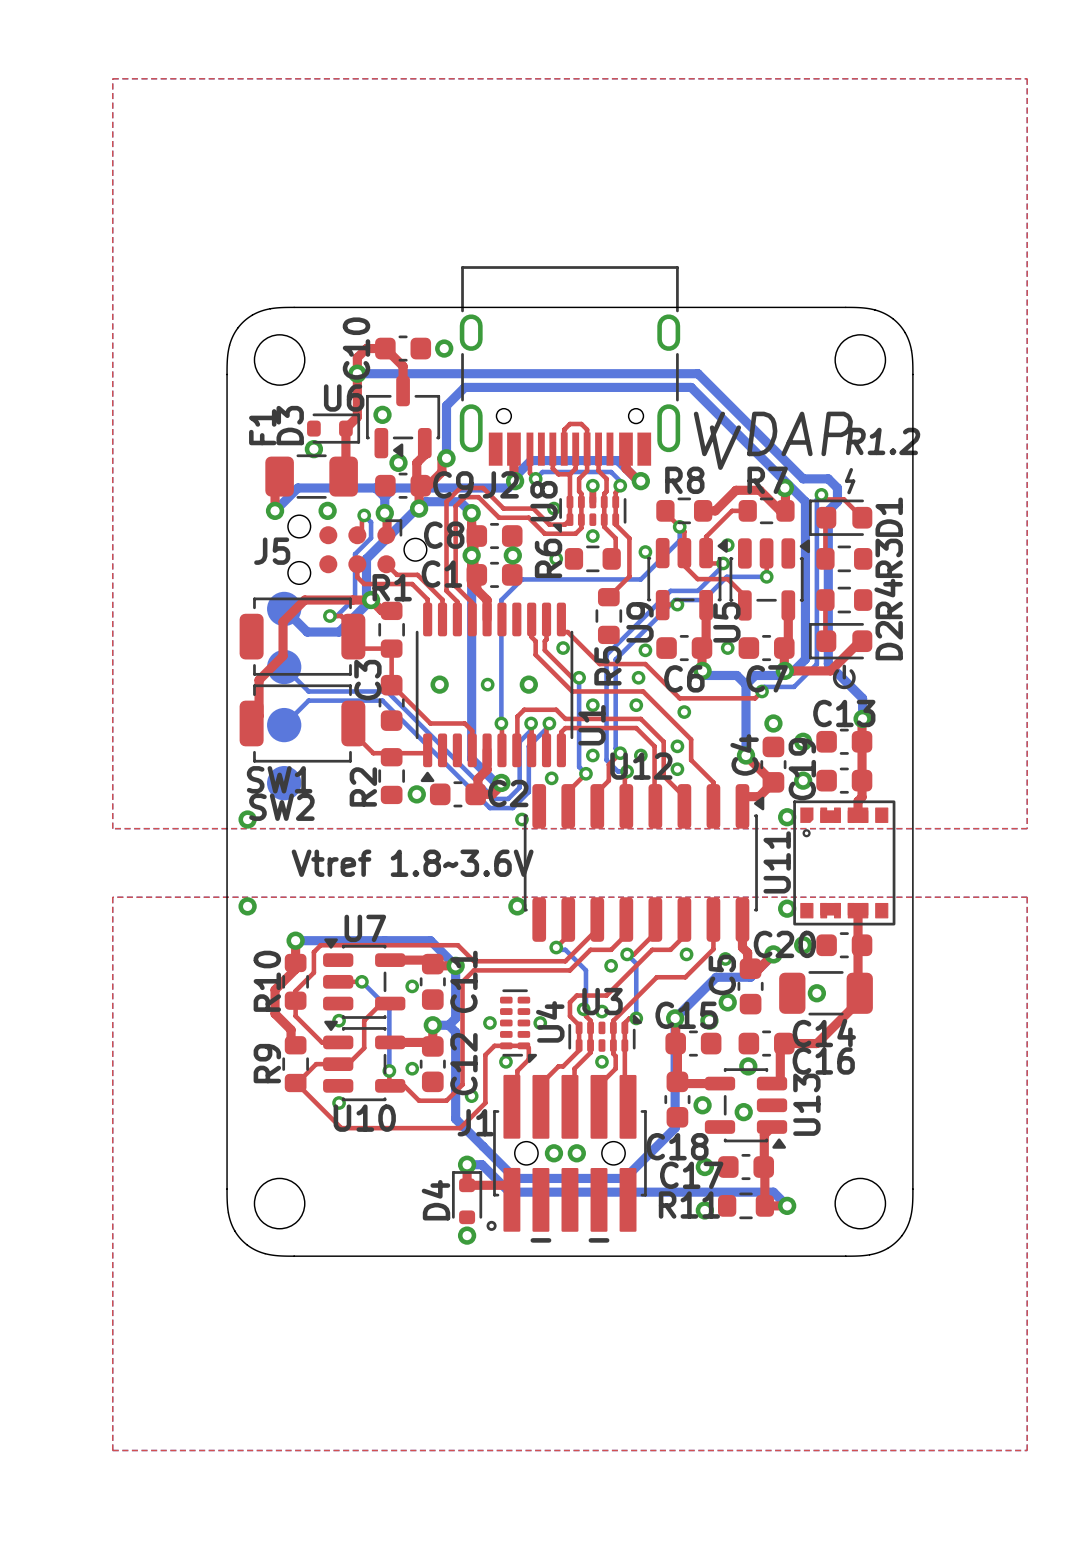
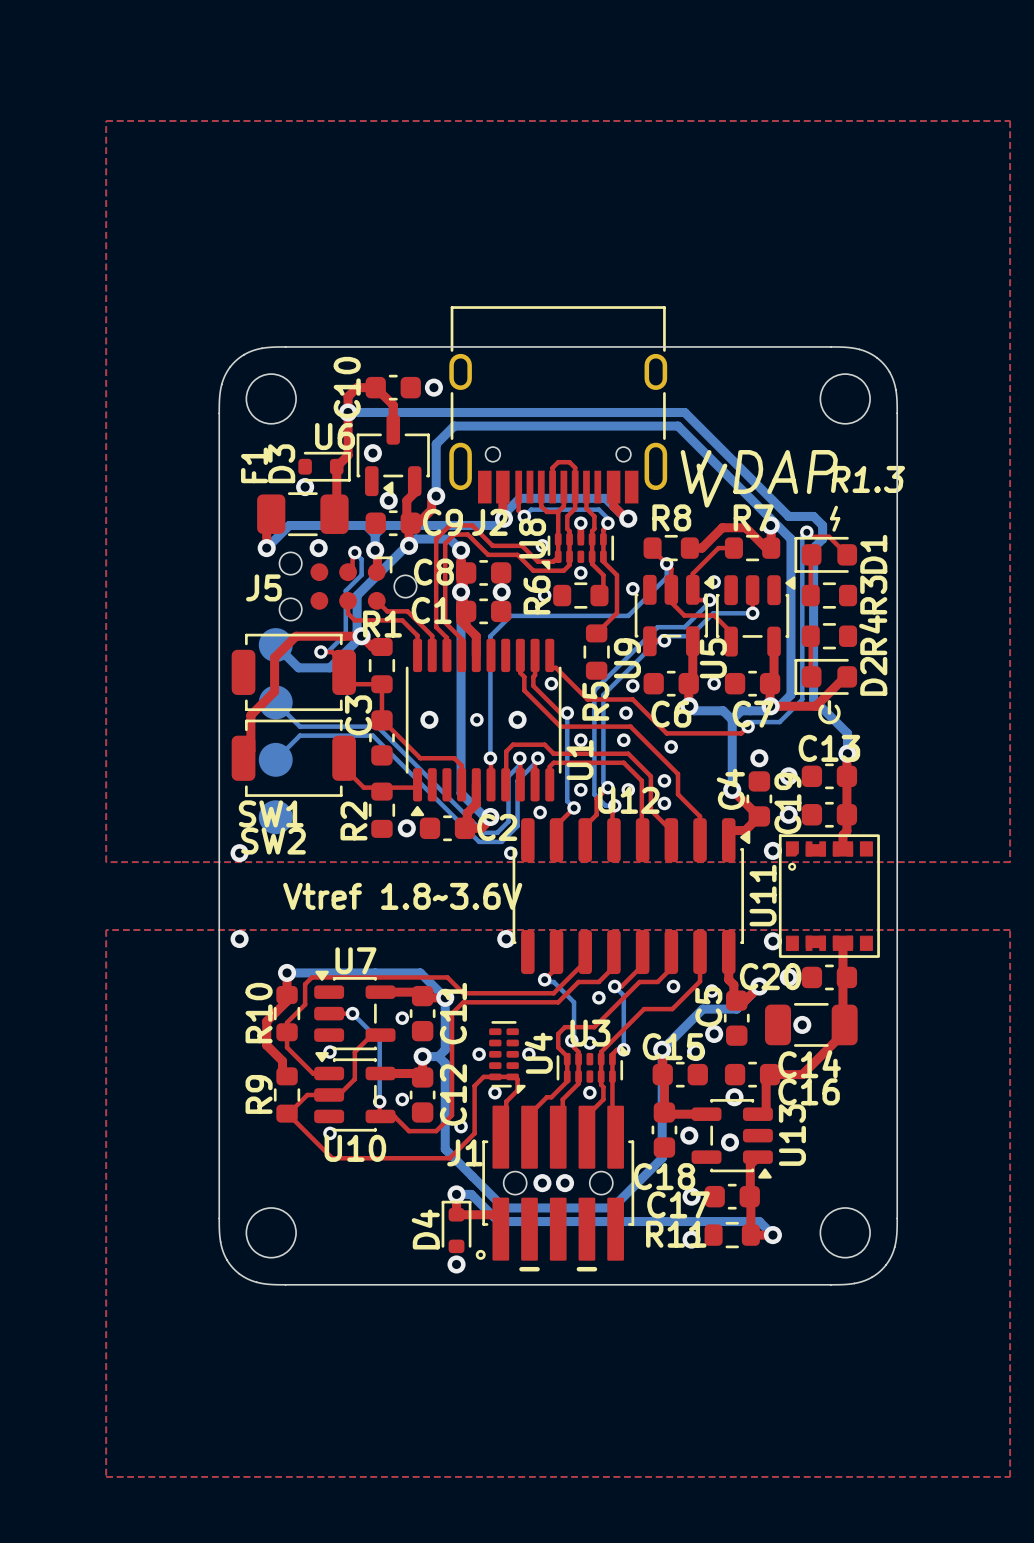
text: R1.2 (883, 441) -> R1.3 (868, 479)

